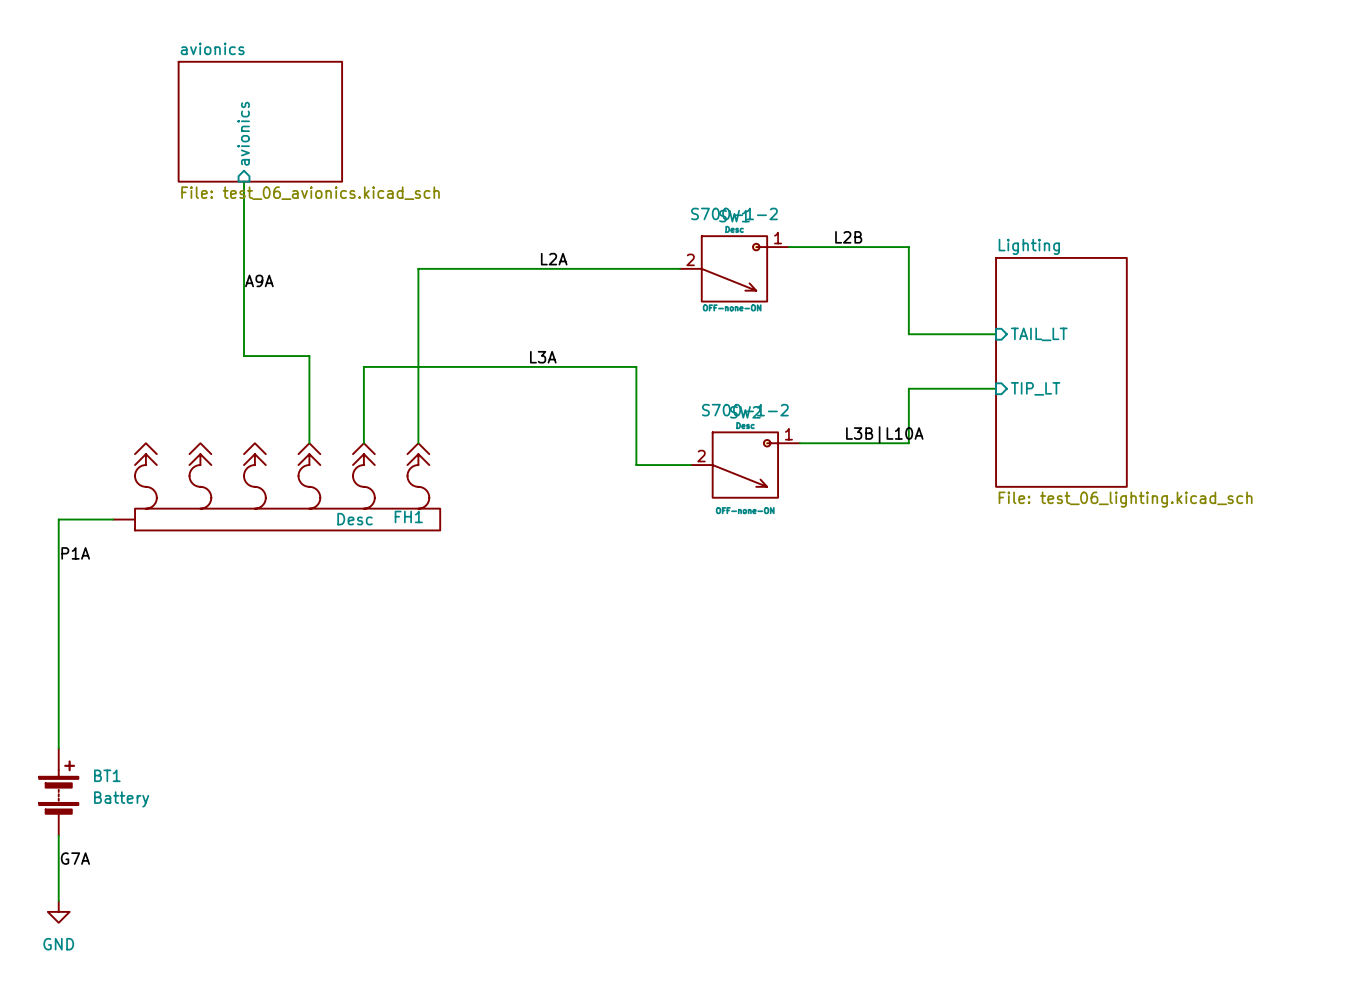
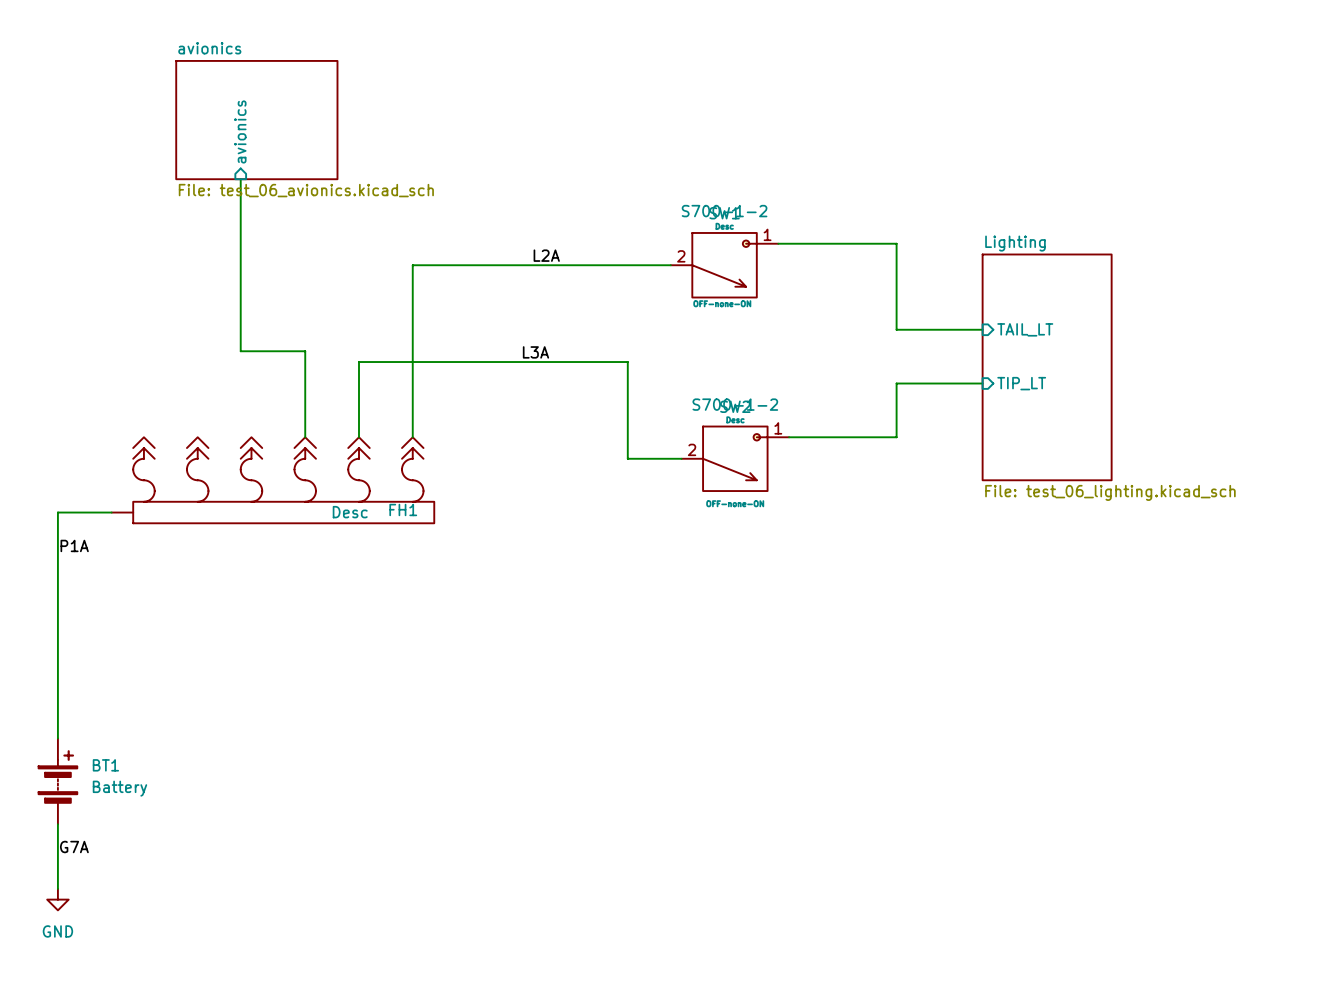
label: L2B (848, 237) -> none
label: A9A (259, 280) -> none
label: L3B|L10A (884, 434) -> none

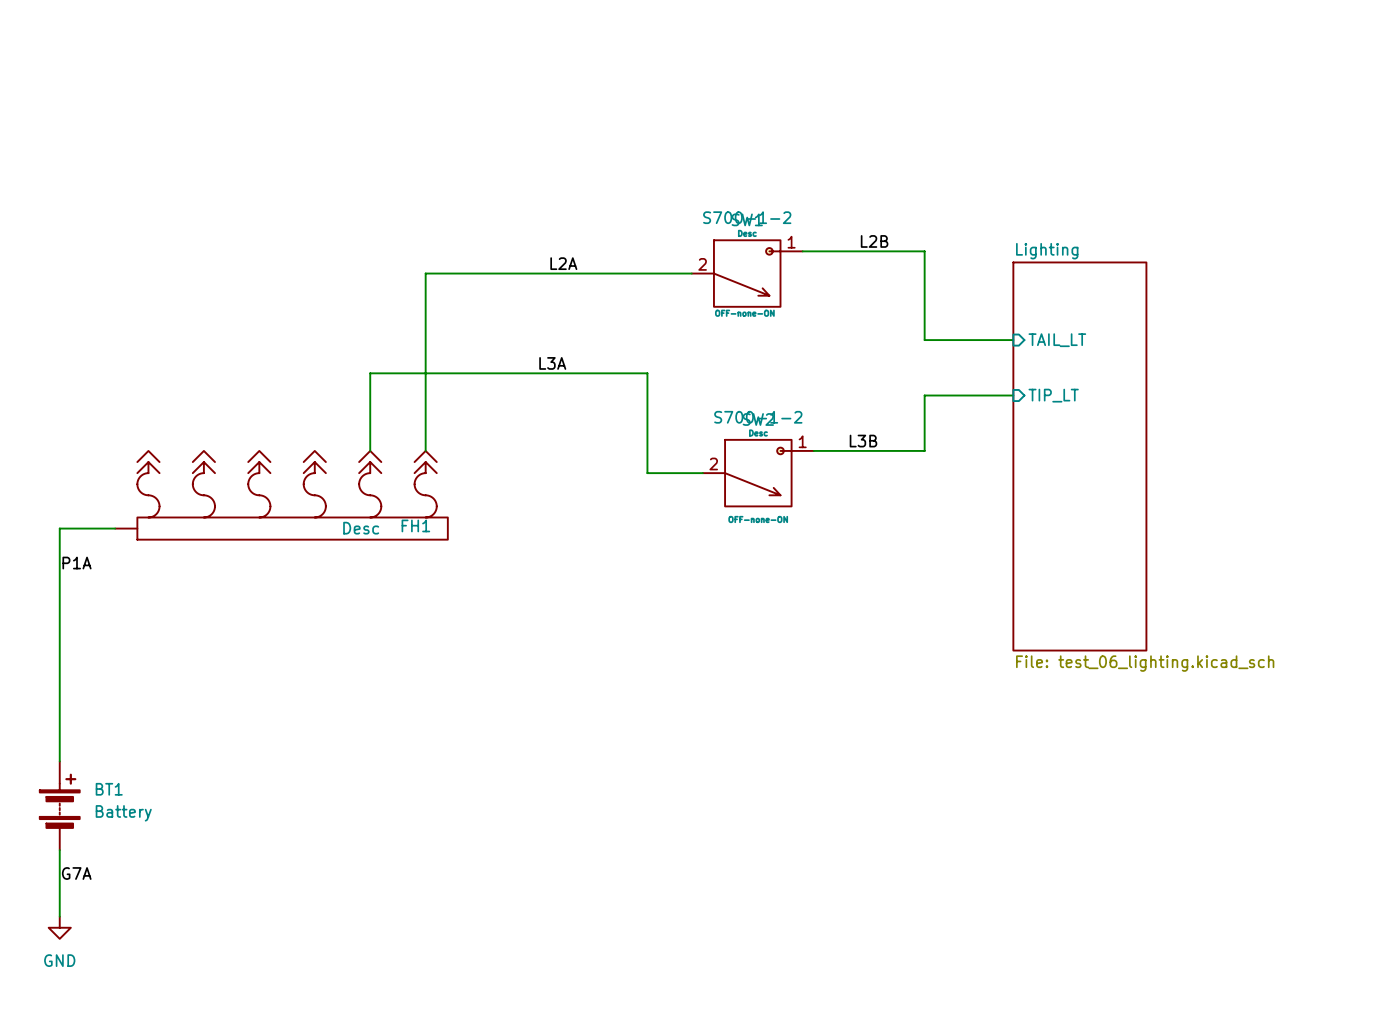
sheet avionics: File: test_06_avionics.kicad_sch (256, 120) -> none
sheet pin: avionics (240, 131) -> none
wire: (240, 179) (240, 351) (305, 351) (305, 437) -> none
label: none -> L2B (874, 241)
sheet Lighting: File: test_06_lighting.kicad_sch (1047, 367) -> none
label: none -> L3B (863, 441)
sheet Lighting: none -> File: test_06_lighting.kicad_sch (1079, 456)

